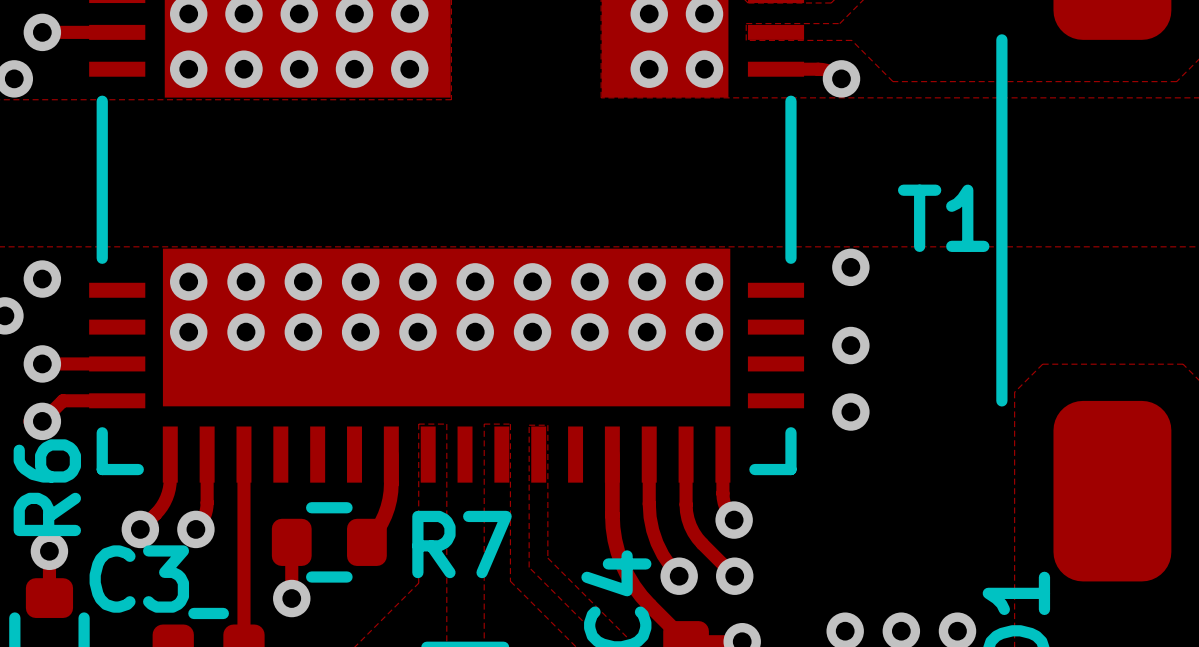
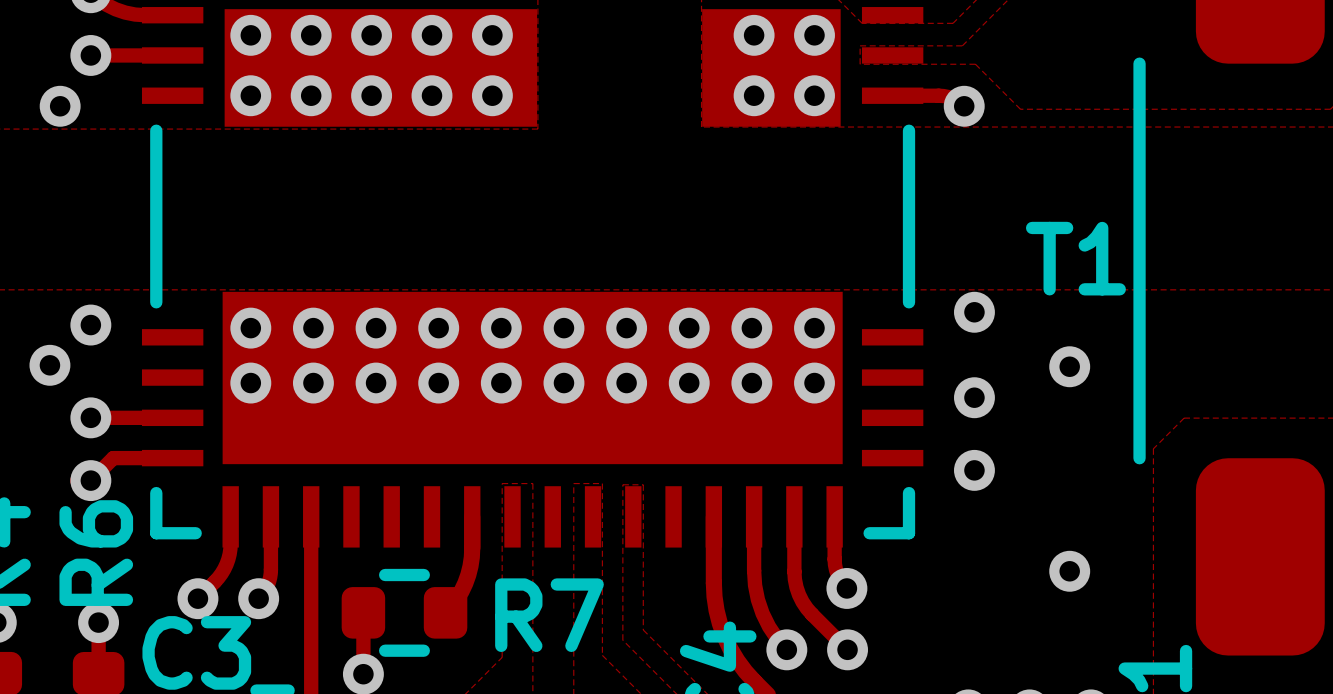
via: none -> (1069, 366)
via: none -> (1069, 571)

